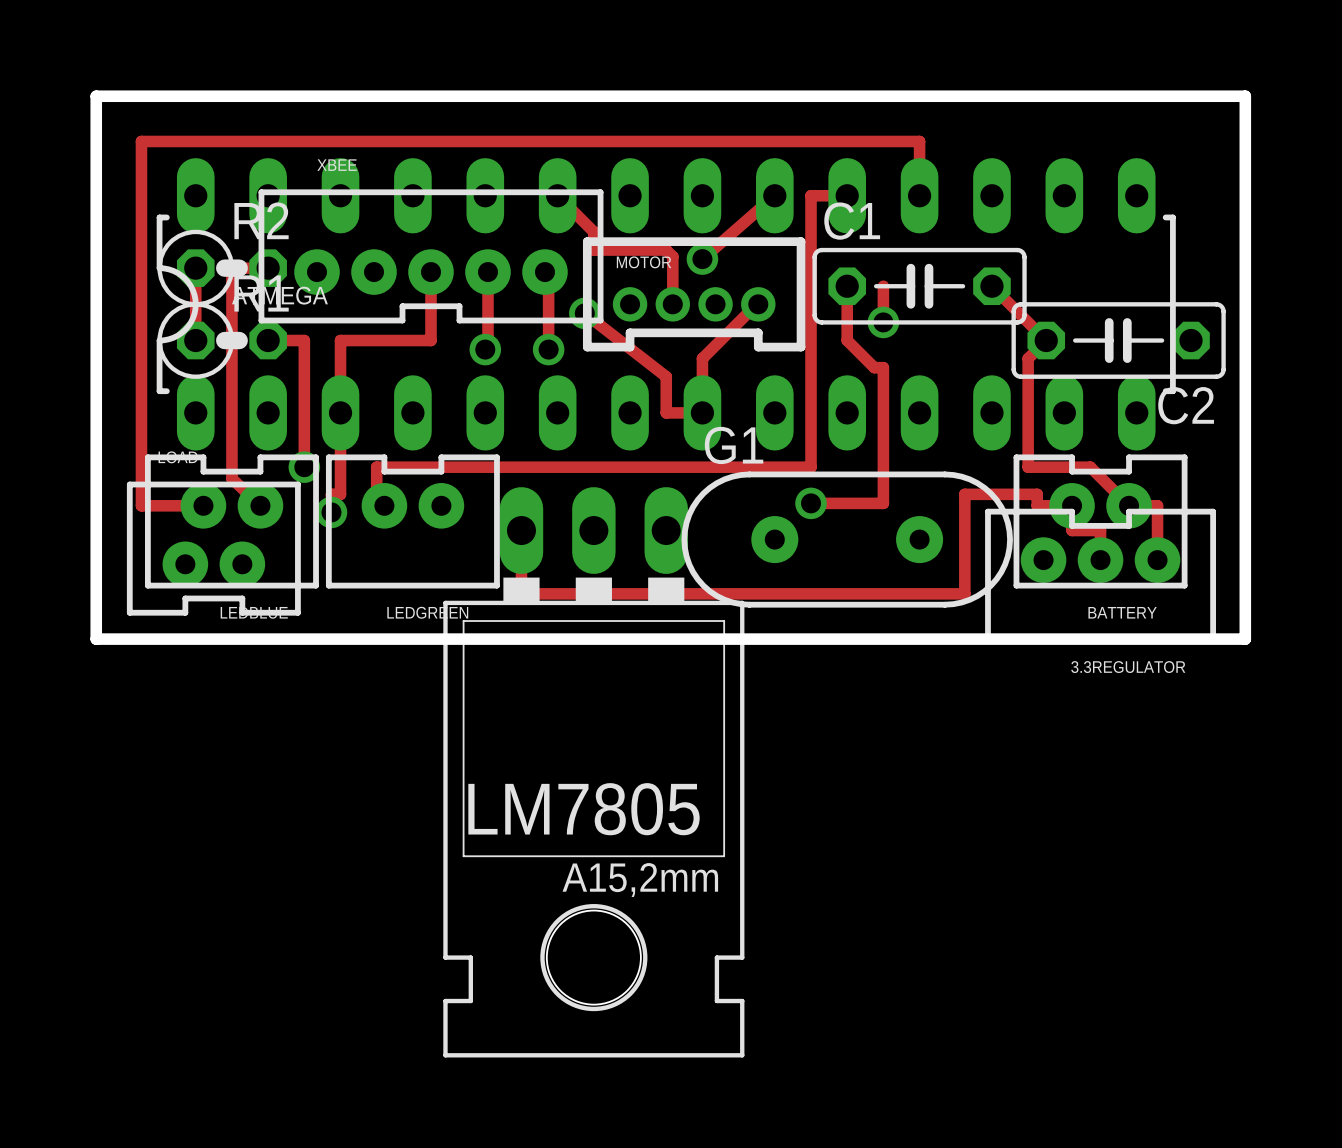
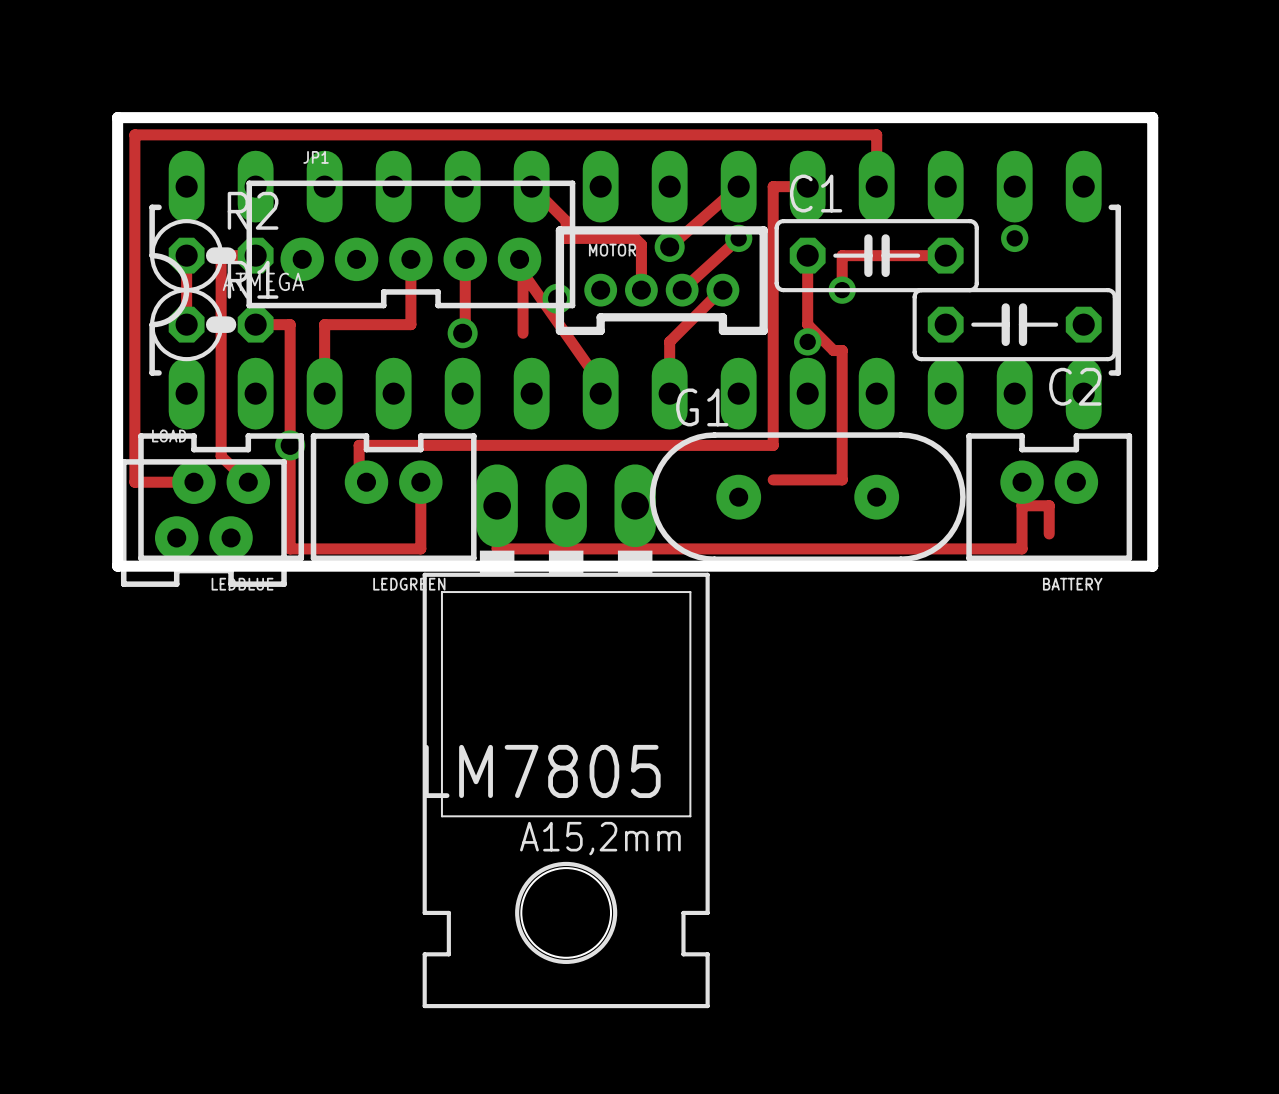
board edge: (96, 96) (1245, 96) (1245, 639) (96, 639) (96, 96) -> (117, 117) (117, 566) (1152, 566) (1152, 117) (117, 117)
XBEE name: XBEE (337, 165) -> JP1 (316, 157)
track: none -> (738, 238) (682, 290)
via: none -> (738, 238)
via: none -> (1014, 238)
track: none -> (945, 255) (842, 255) (842, 272)
track: none -> (519, 268) (600, 383) (600, 393)
C1 position: (919, 286) -> (876, 255)
track: (991, 286) (1046, 340) (1028, 358) (1028, 467) (1090, 467) (1129, 505) (1157, 505) (1157, 560) -> none
track: (584, 313) (666, 376) (666, 412) (702, 412) -> none
via position: (883, 322) -> (842, 290)
C2 position: (1118, 340) -> (1014, 324)
via: (548, 349) -> none
via: none -> (807, 341)
track: (340, 412) (340, 494) (331, 494) (331, 512) -> none
track: none -> (290, 445) (290, 548) (420, 548) (420, 482)
via: (811, 503) -> none
track: (1072, 505) (1037, 505) (1037, 494) (964, 494) (964, 593) (521, 593) (521, 575) -> (1022, 505) (1022, 548) (497, 548)
via: (331, 512) -> none
G1 position: (847, 539) -> (807, 497)
3.3REGULATOR: (1100, 575) -> none

